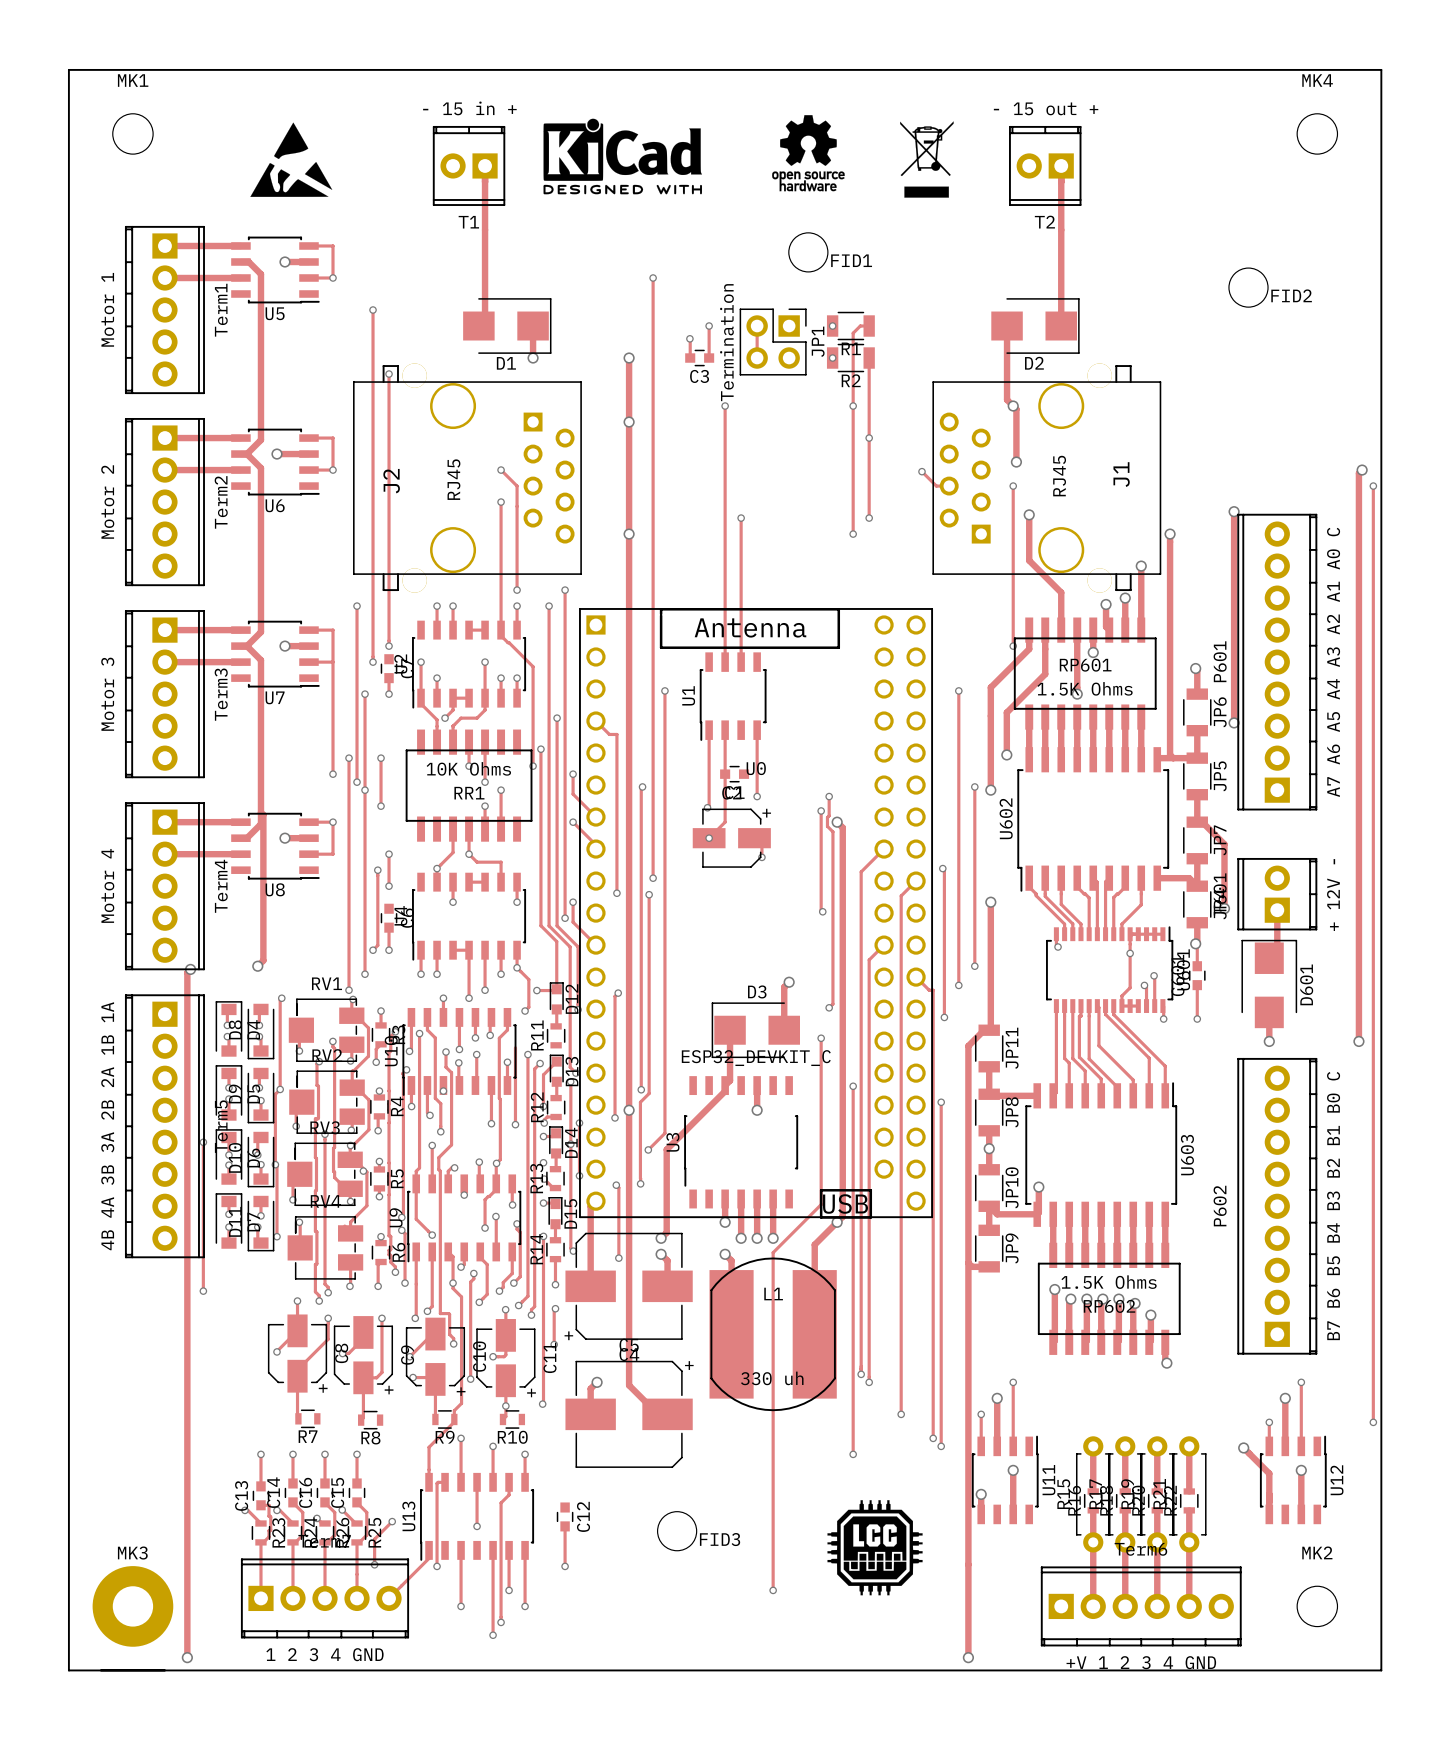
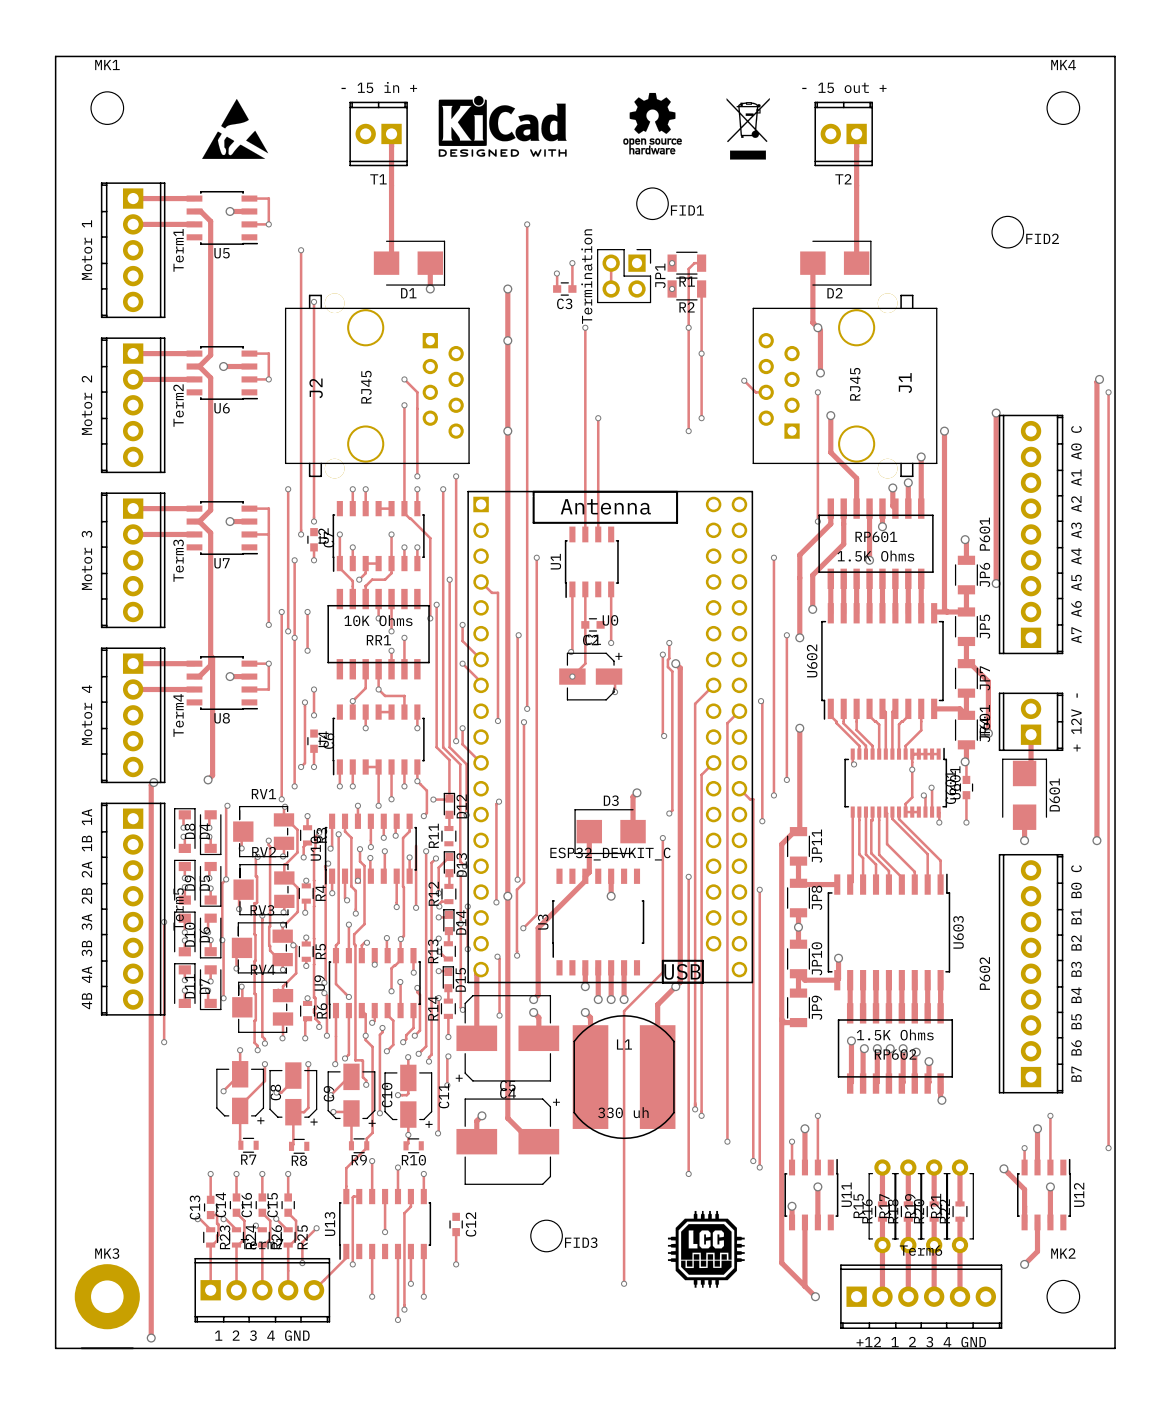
track: none -> (804, 1222) (804, 1286)
track: none -> (1037, 1222) (1037, 1251) (1024, 1264)
track: (968, 1564) (968, 1657) -> (781, 1262) (815, 1296)
via: none -> (1024, 1264)
via position: (968, 1657) -> (815, 1296)
Term6 value: +V 1 2 3 4 GND (1141, 1662) -> +12 1 2 3 4 GND (921, 1342)

